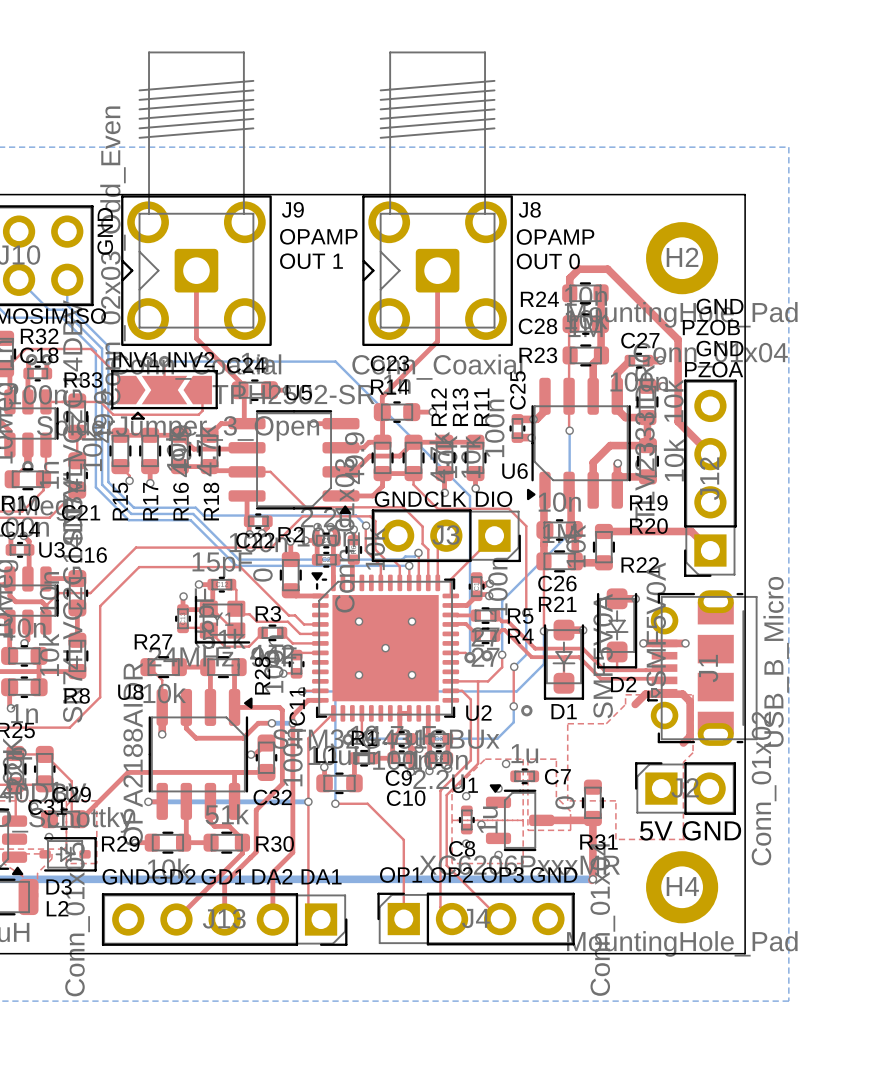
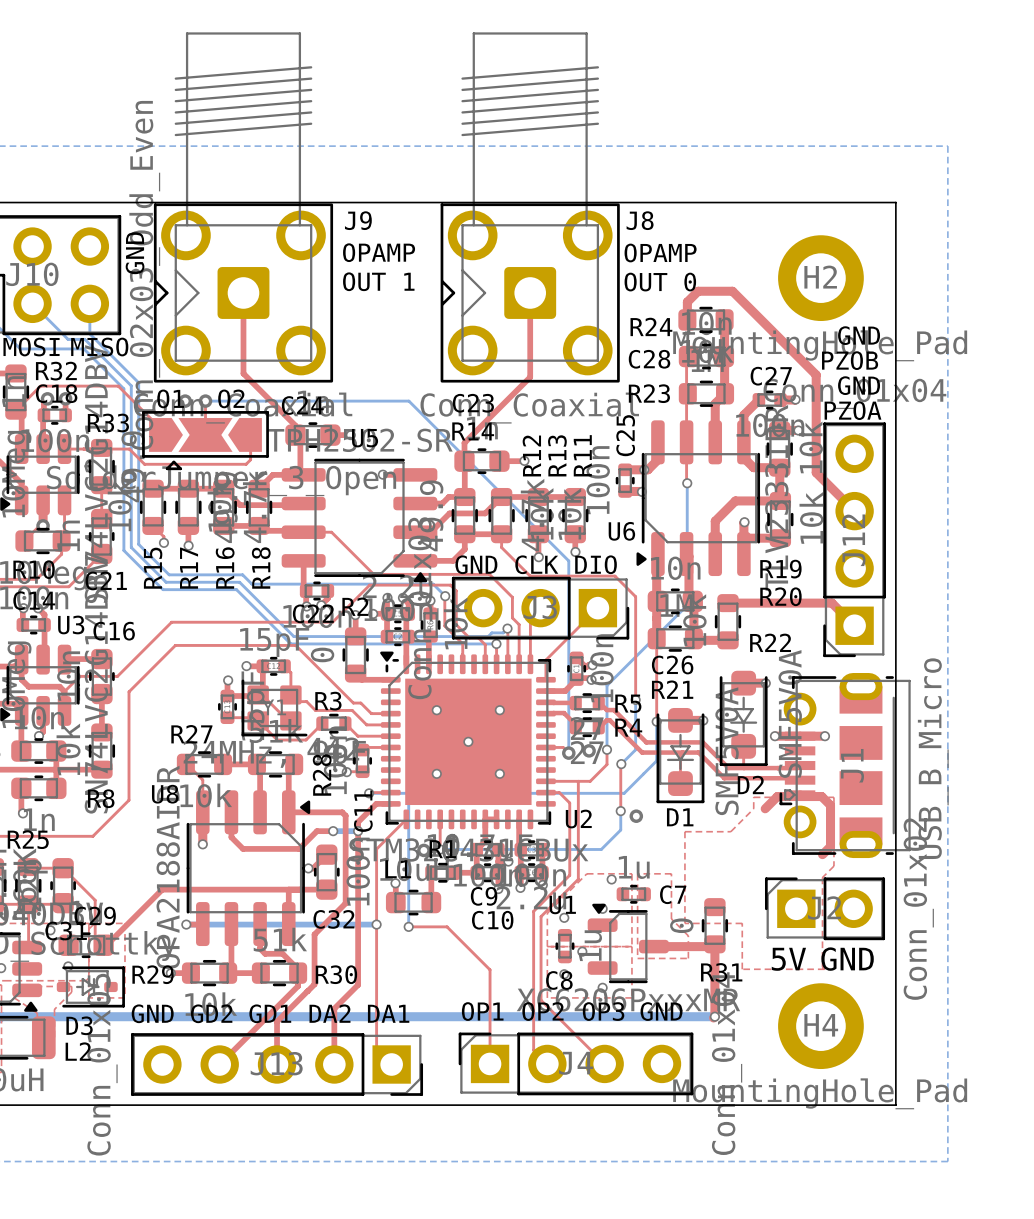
text: INV1 (136, 359) -> O1 (170, 398)
text: INV2 (191, 359) -> O2 (231, 398)

